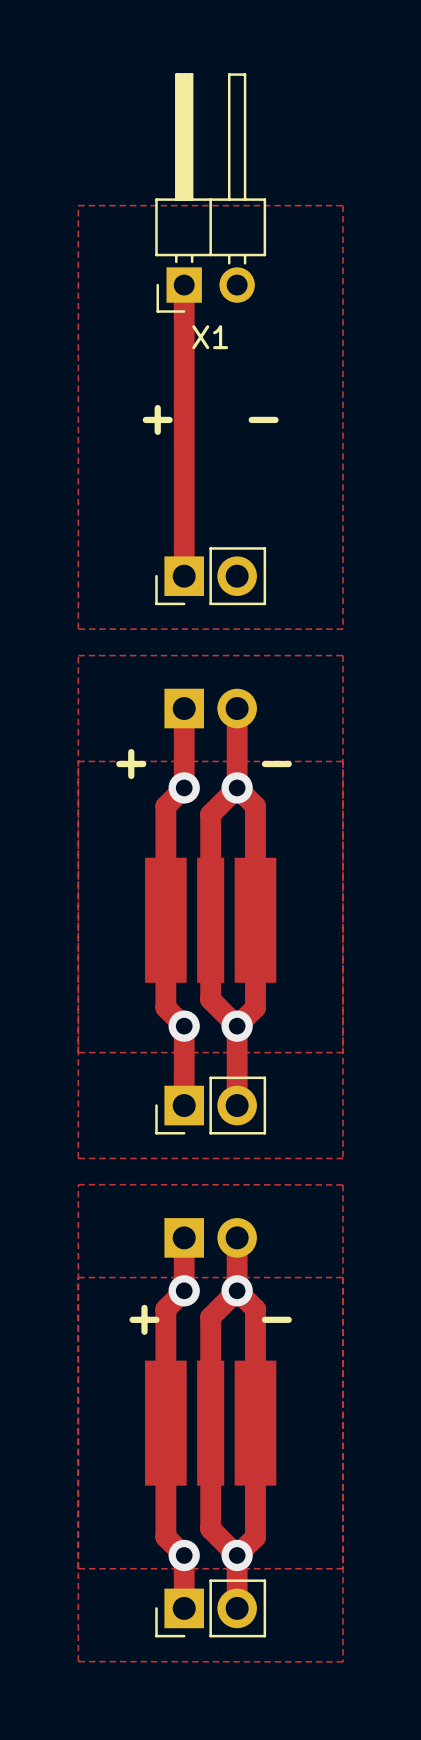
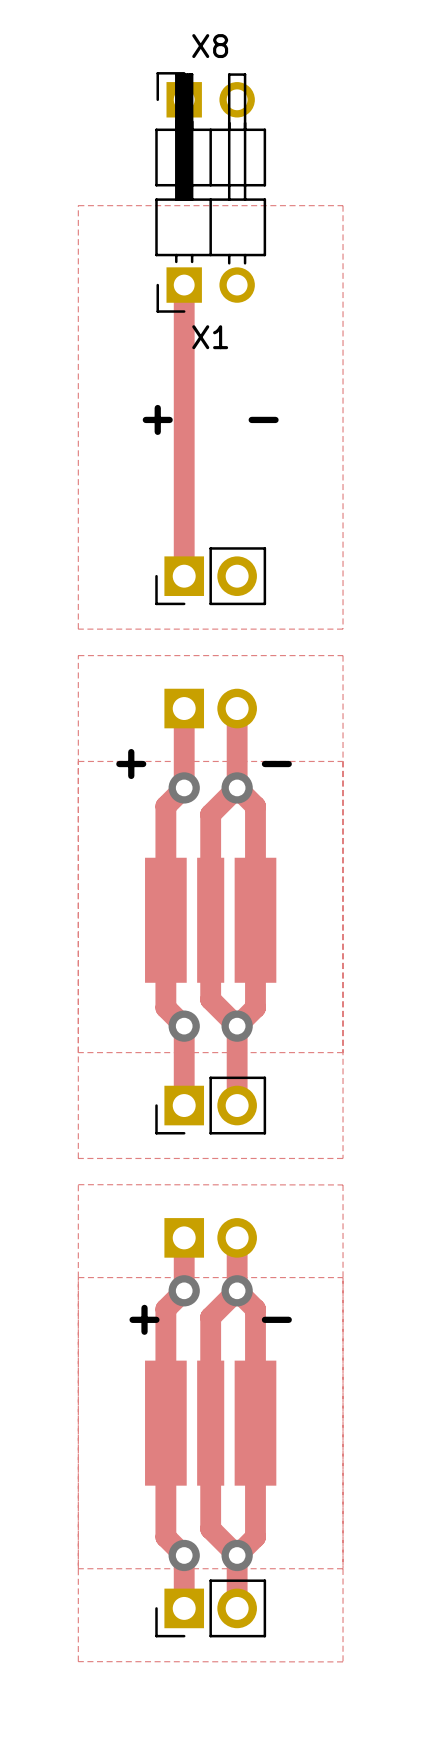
X8: none -> (210, 129)

